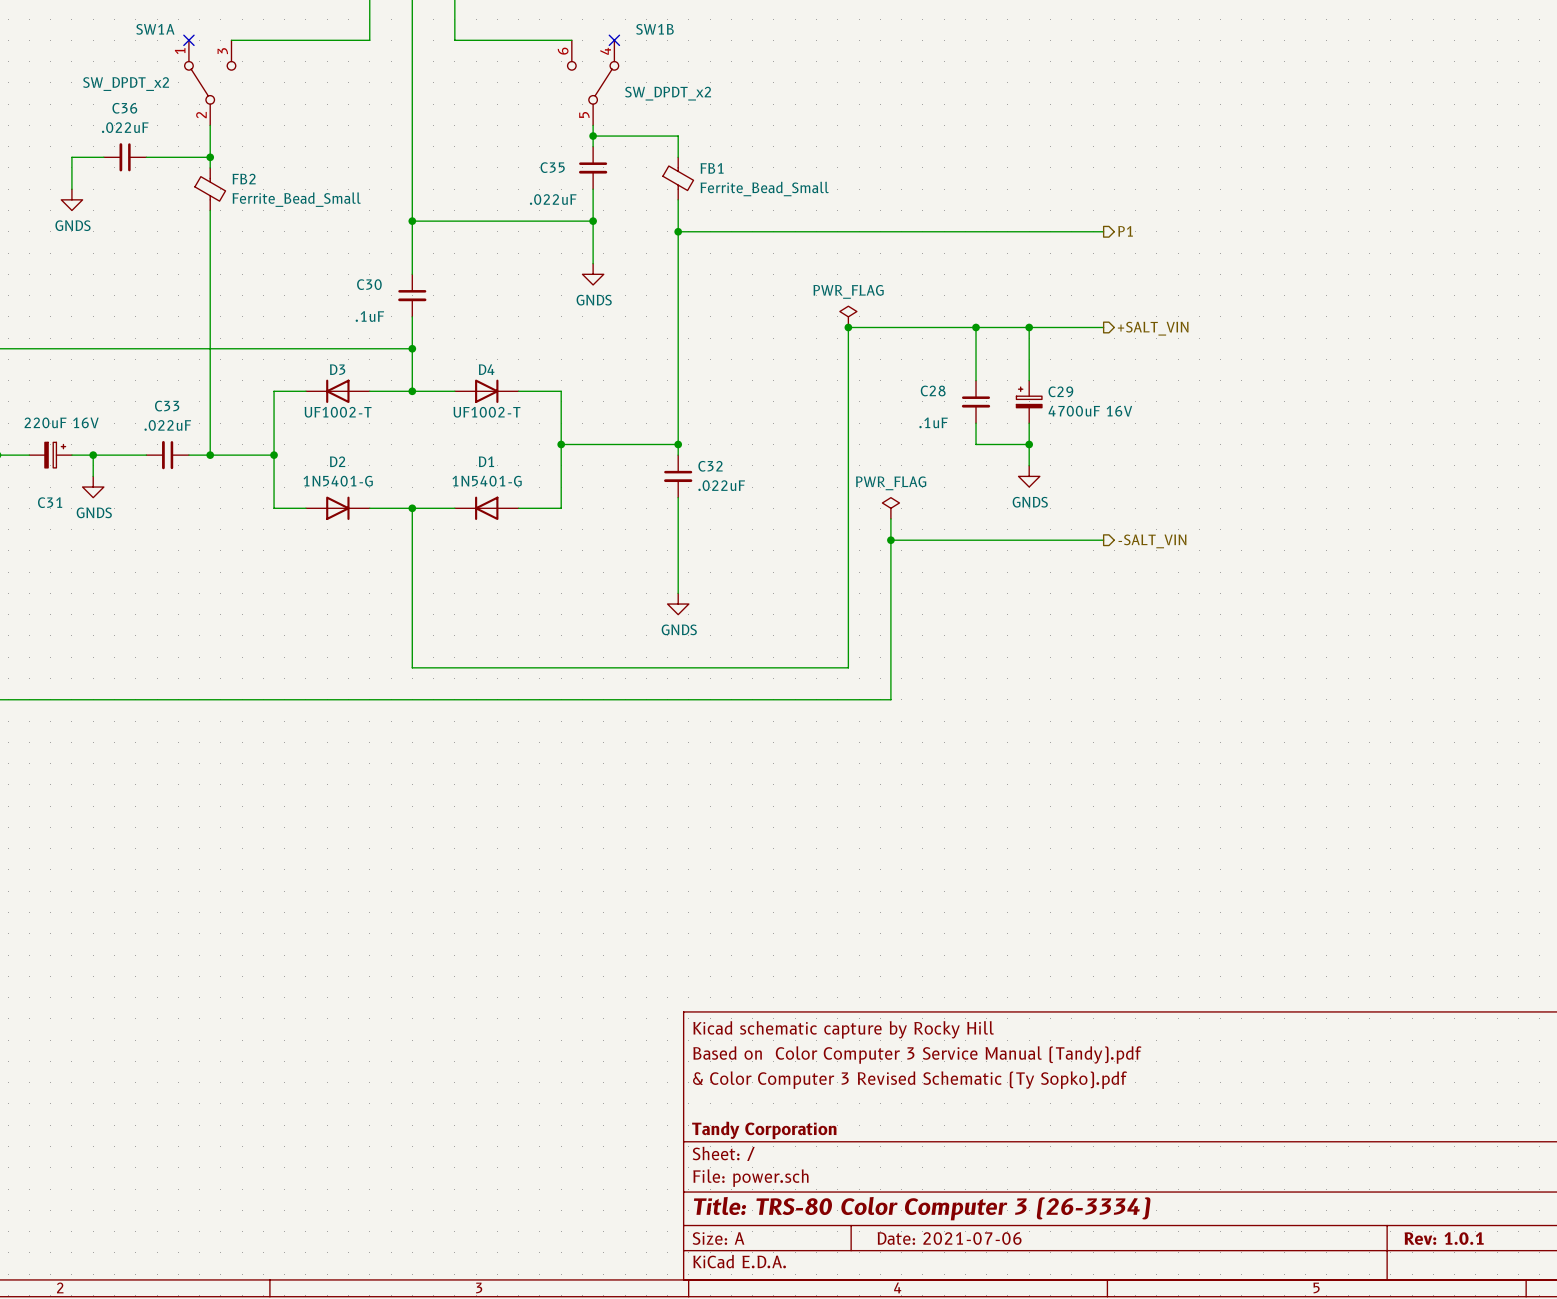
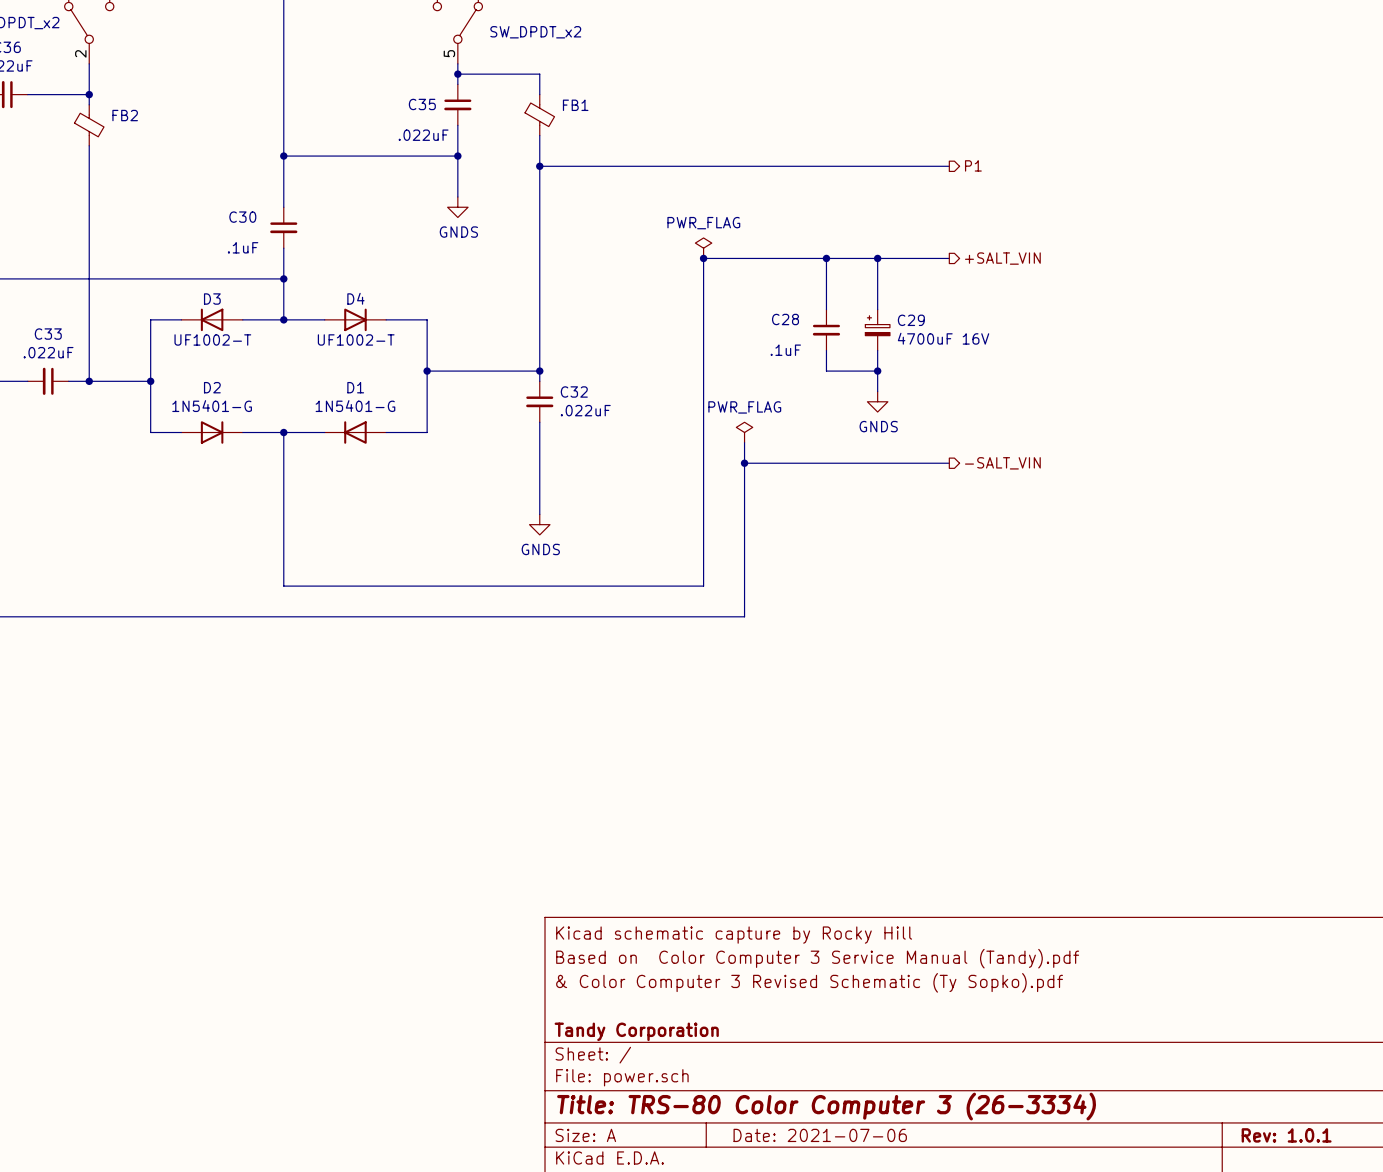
FB1 value: Ferrite_Bead_Small (764, 189) -> none
FB2 value: Ferrite_Bead_Small (296, 199) -> none

